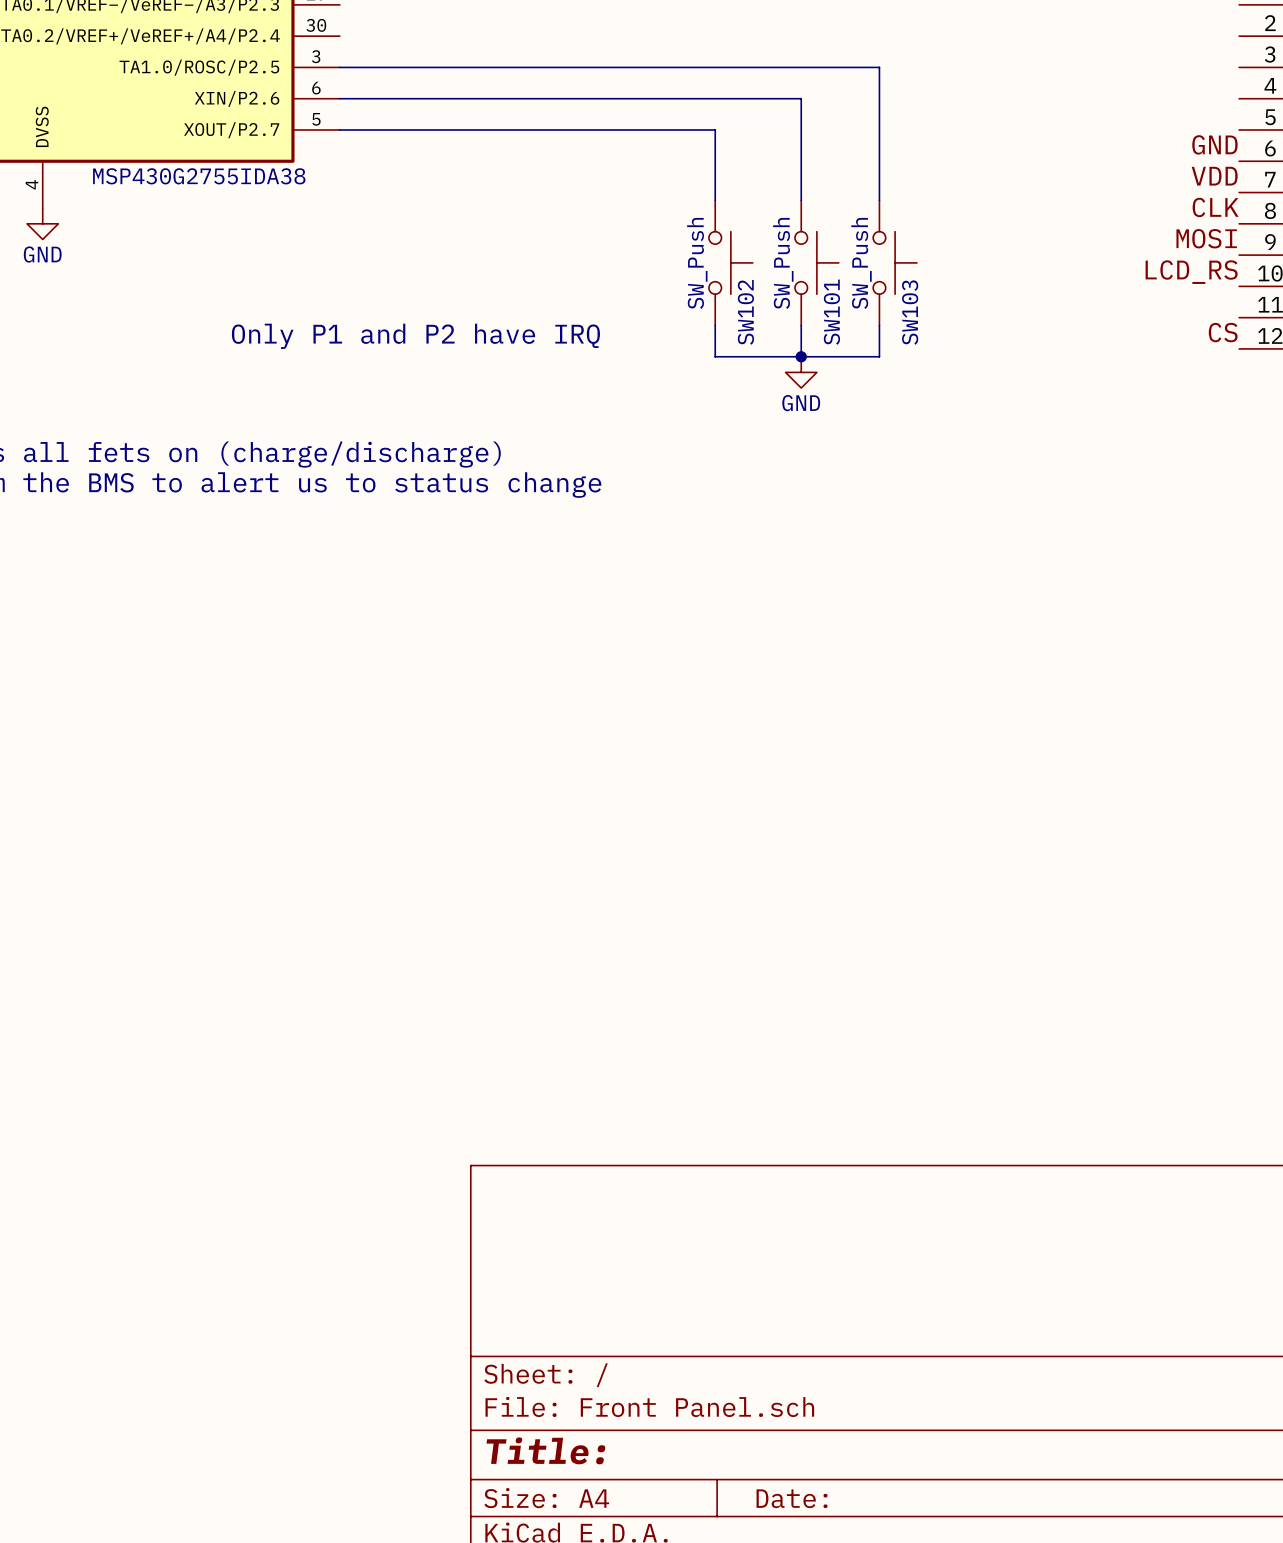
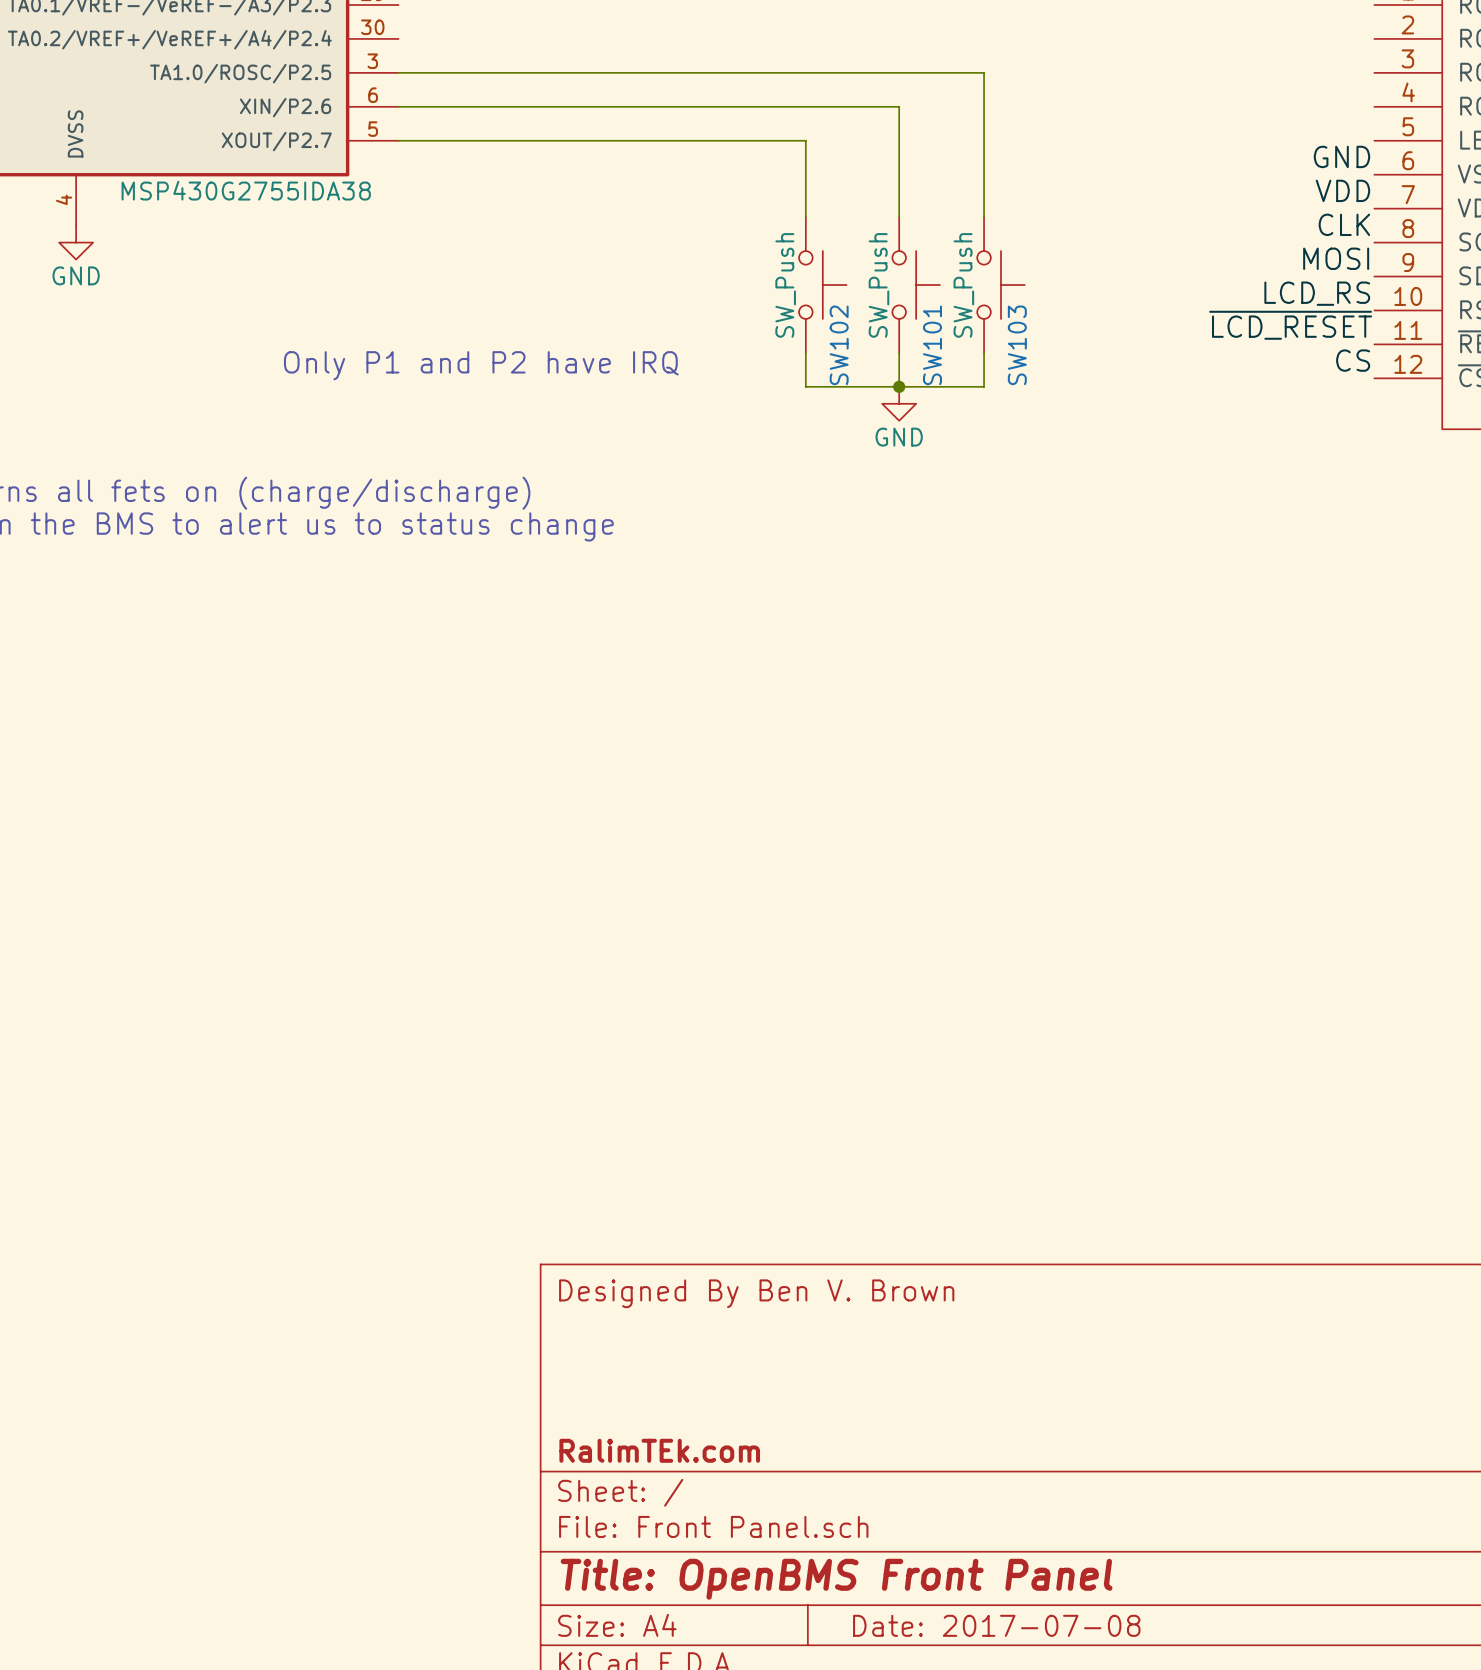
label: none -> ~{LCD_RESET} (1290, 325)
title block: none -> Designed By Ben V. Brown (756, 1293)
title block: none -> RalimTEk.com (659, 1450)
title block: Title: (545, 1450) -> Title: OpenBMS Front Panel (836, 1579)
title block: Date: (792, 1498) -> Date: 2017-07-08 (996, 1625)

